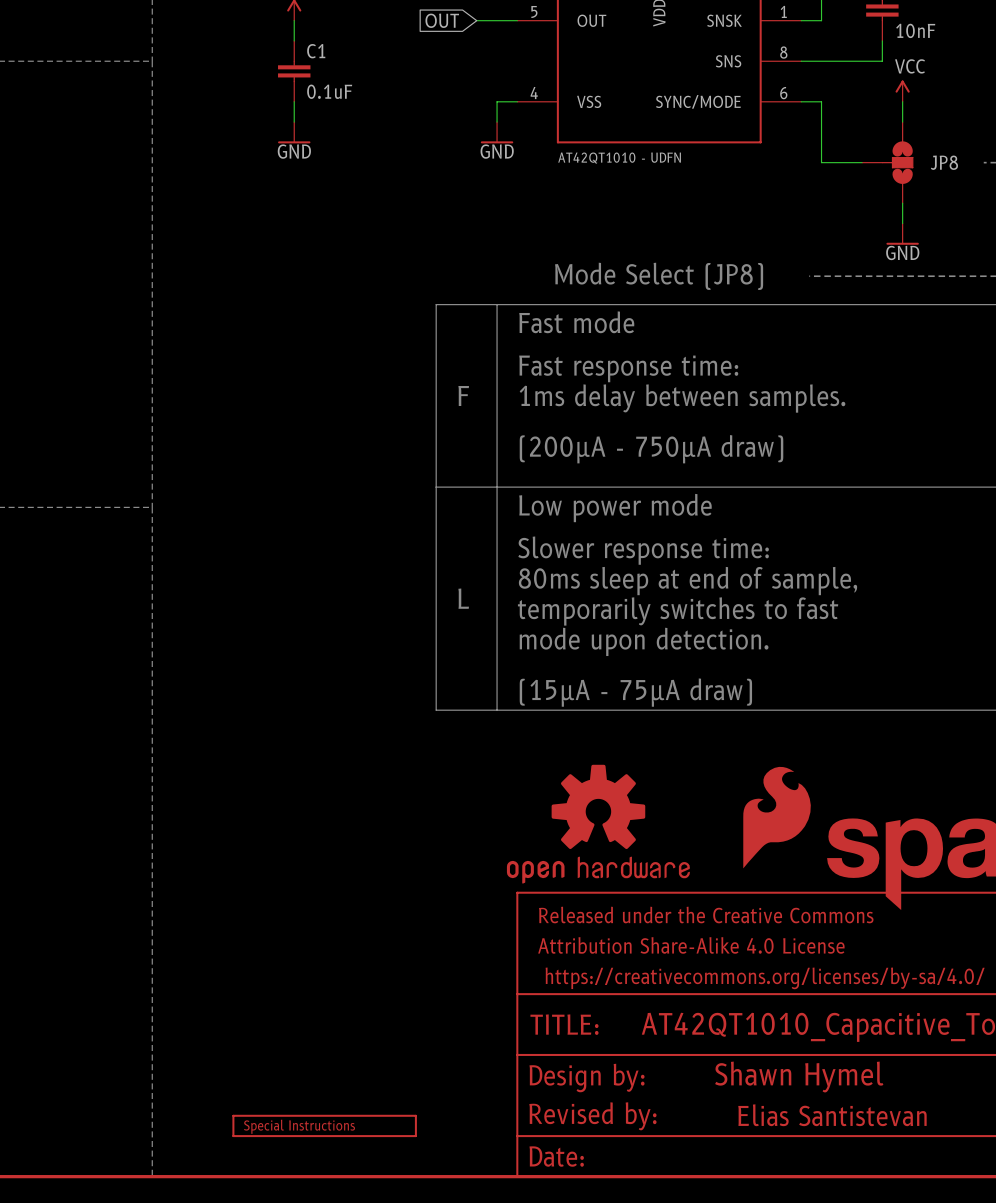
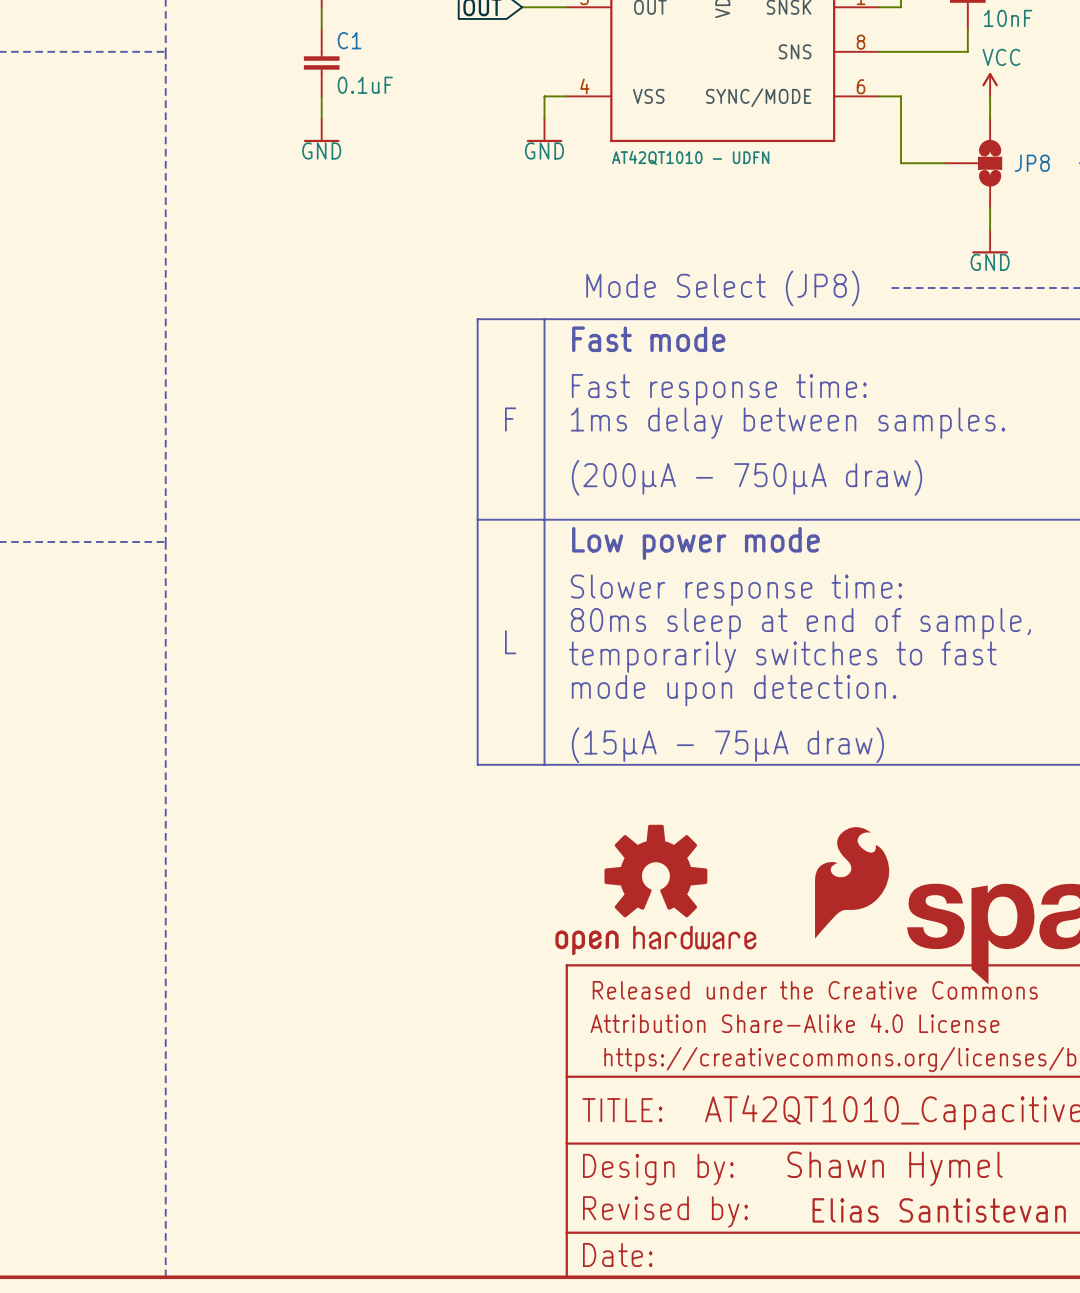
part: (324, 1125) -> none

